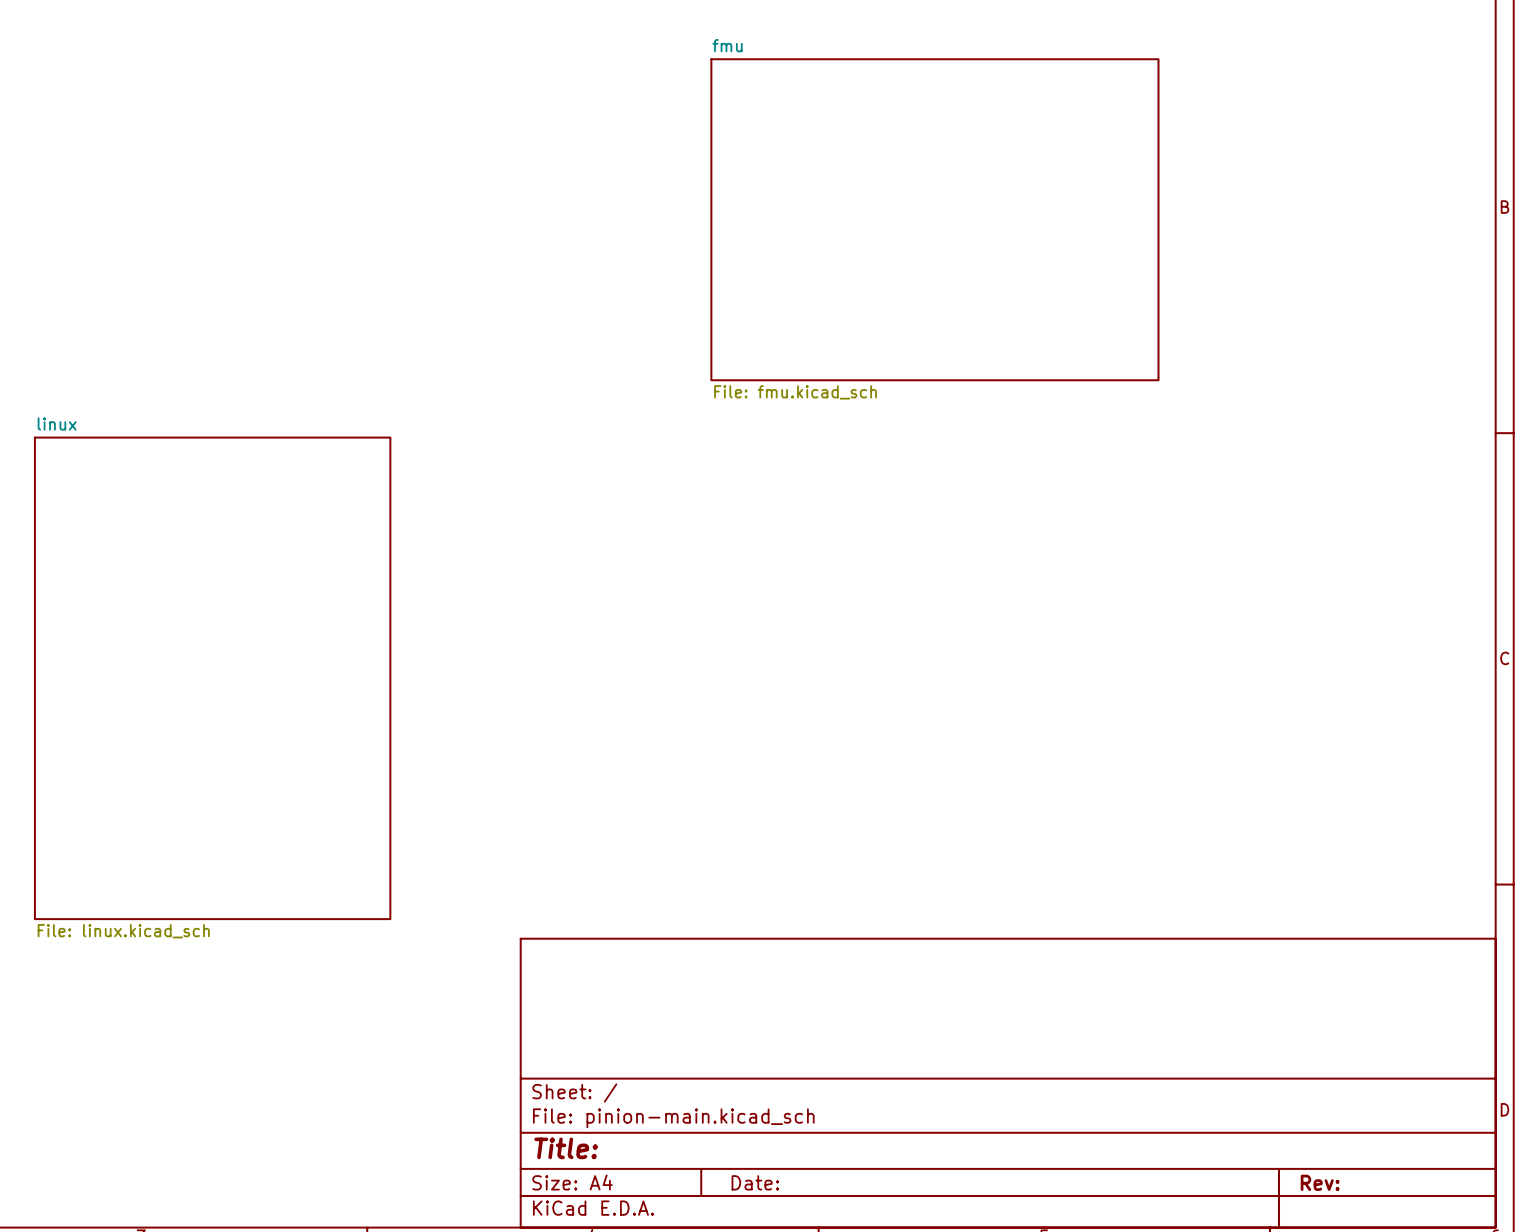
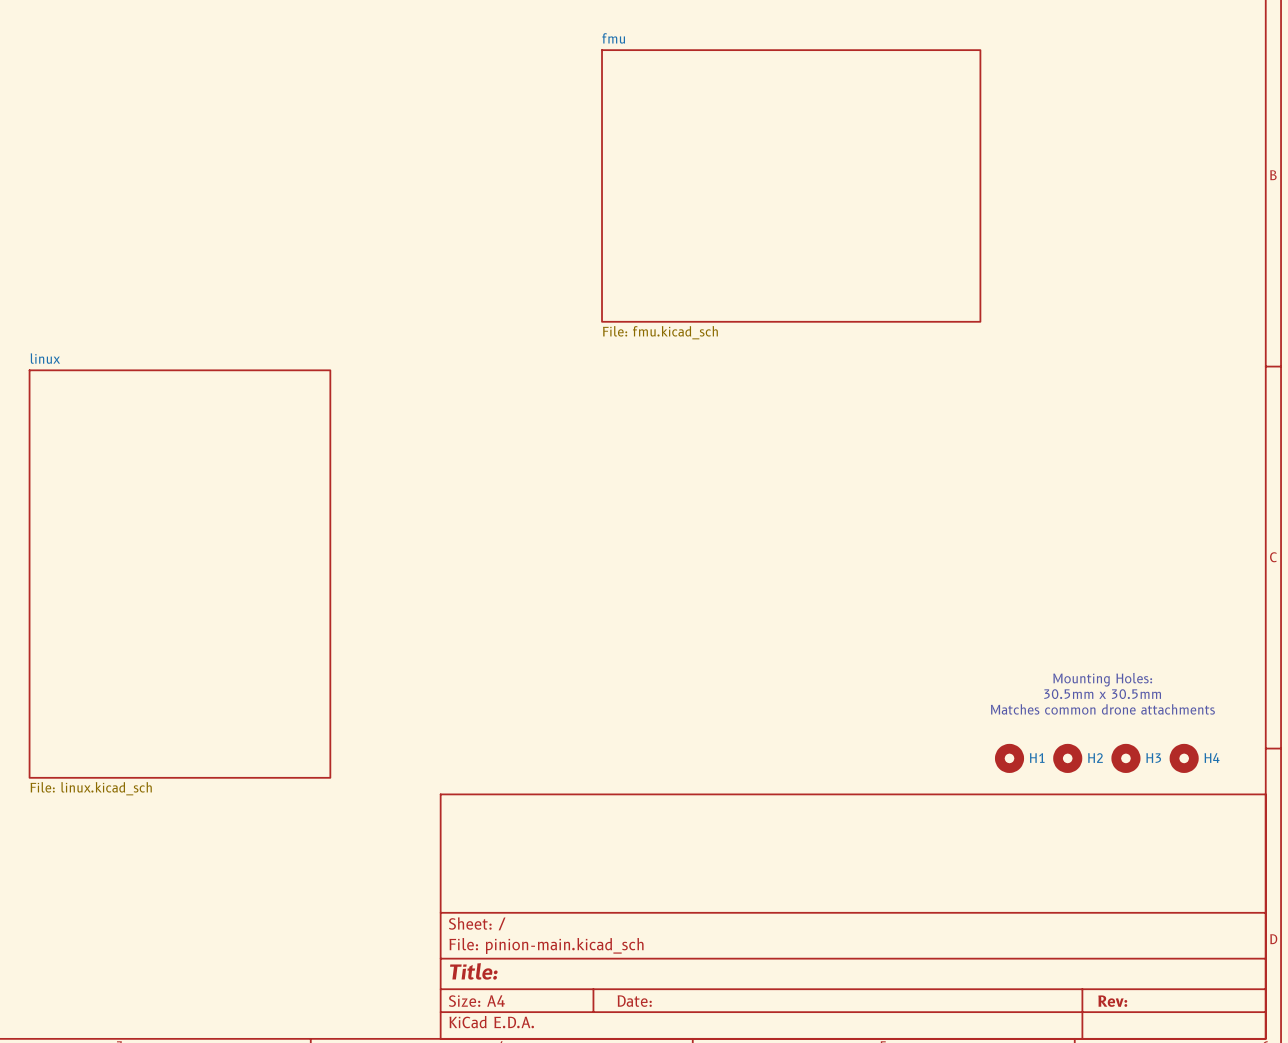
text: none -> Mounting Holes: (1102, 679)
text: none -> 30.5mm x 30.5mm (1102, 694)
text: none -> Matches common drone attachments (1102, 709)
H1: none -> (1009, 758)
H2: none -> (1067, 758)
H3: none -> (1125, 758)
H4: none -> (1184, 758)

